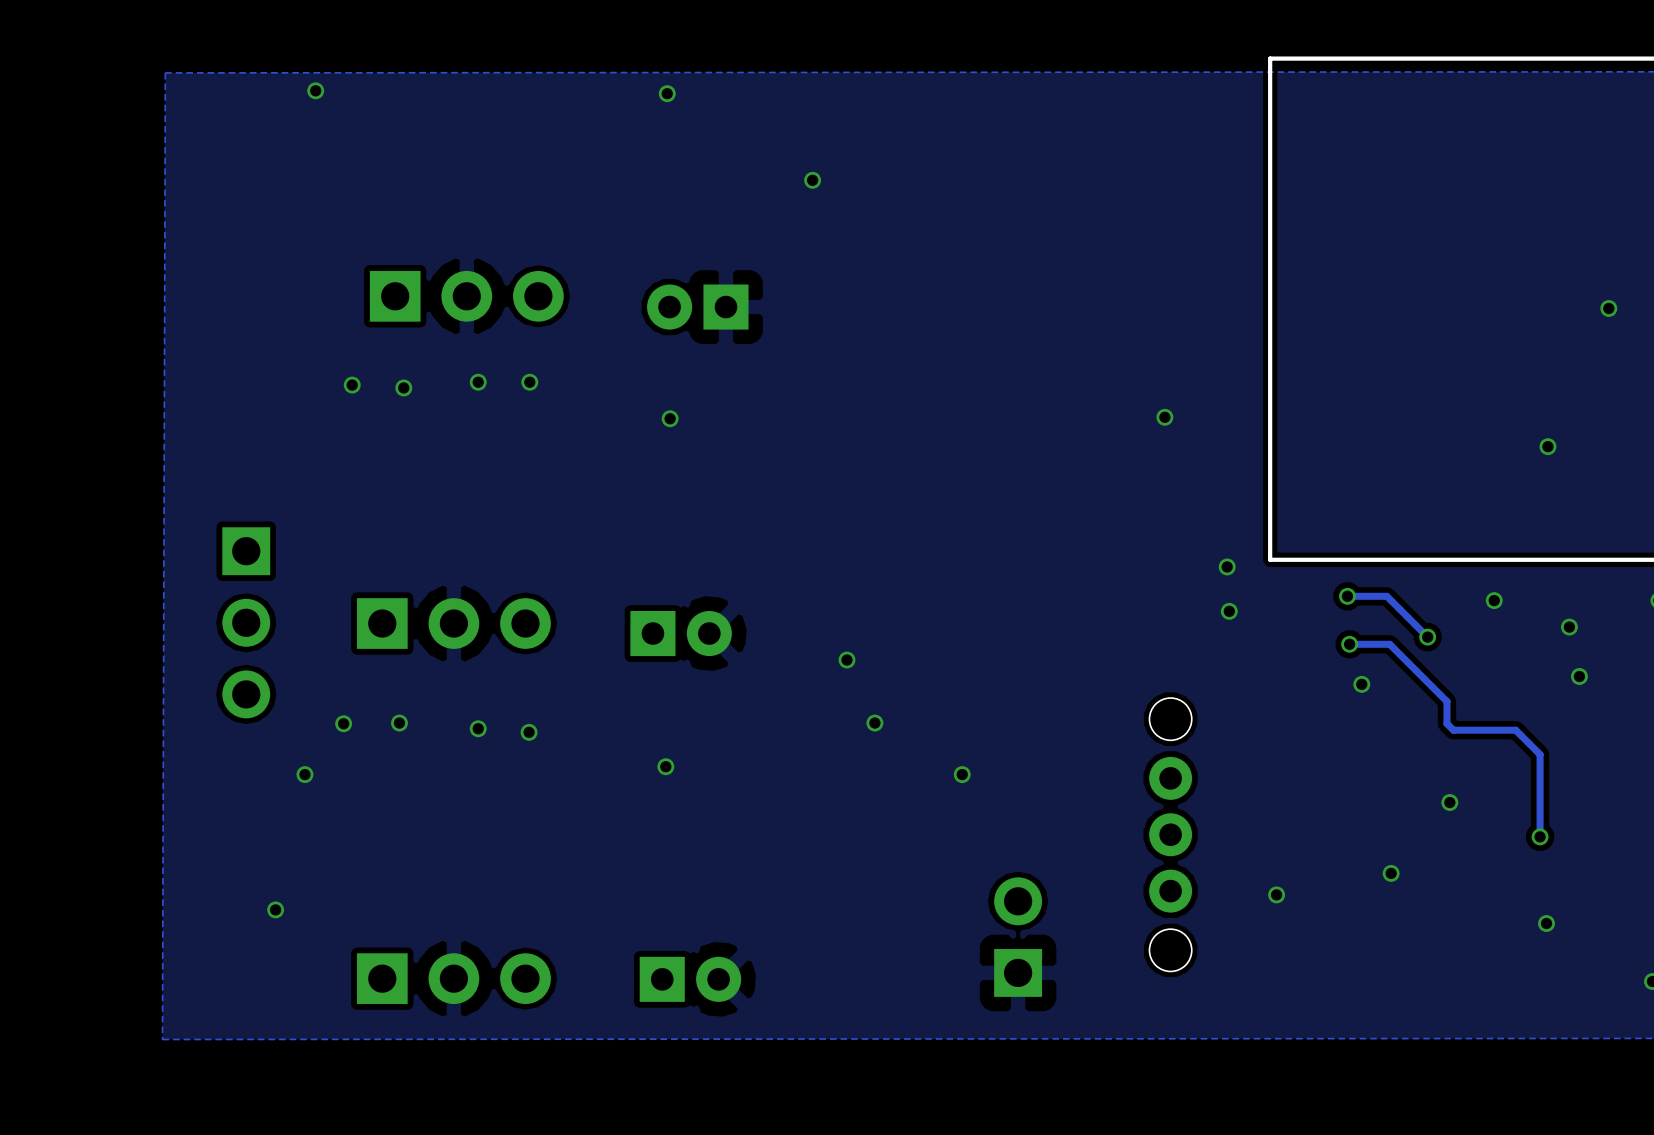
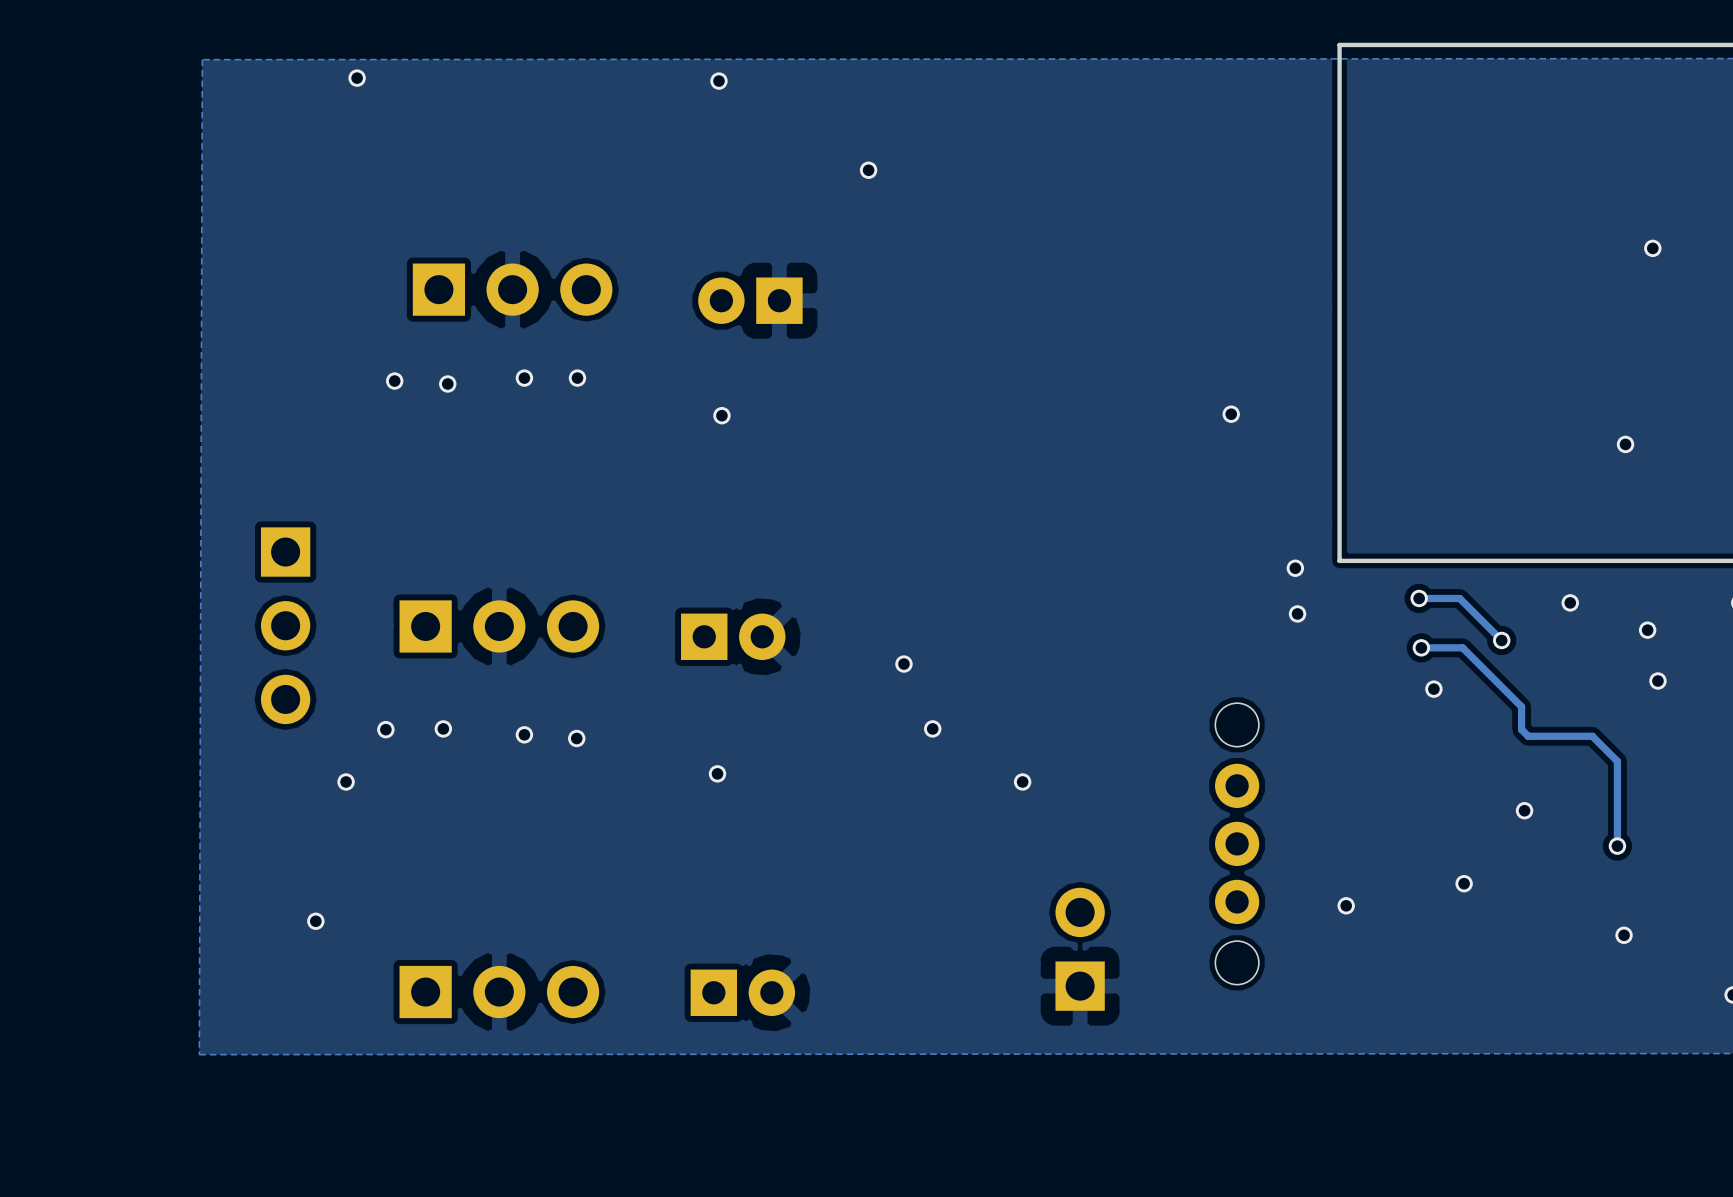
via position: (1608, 308) -> (1652, 248)

